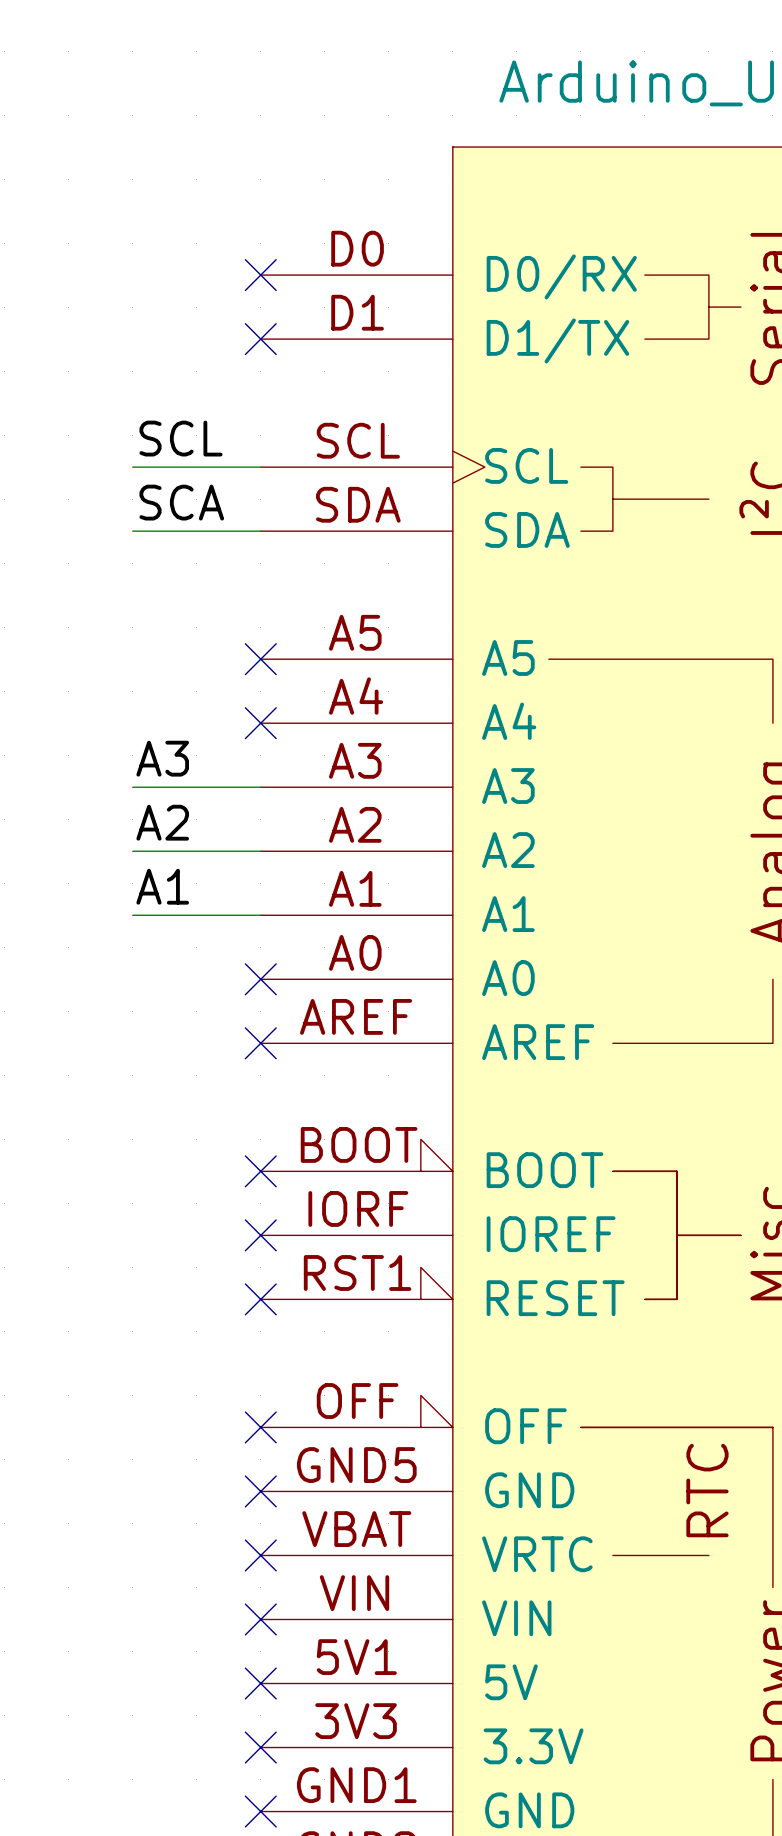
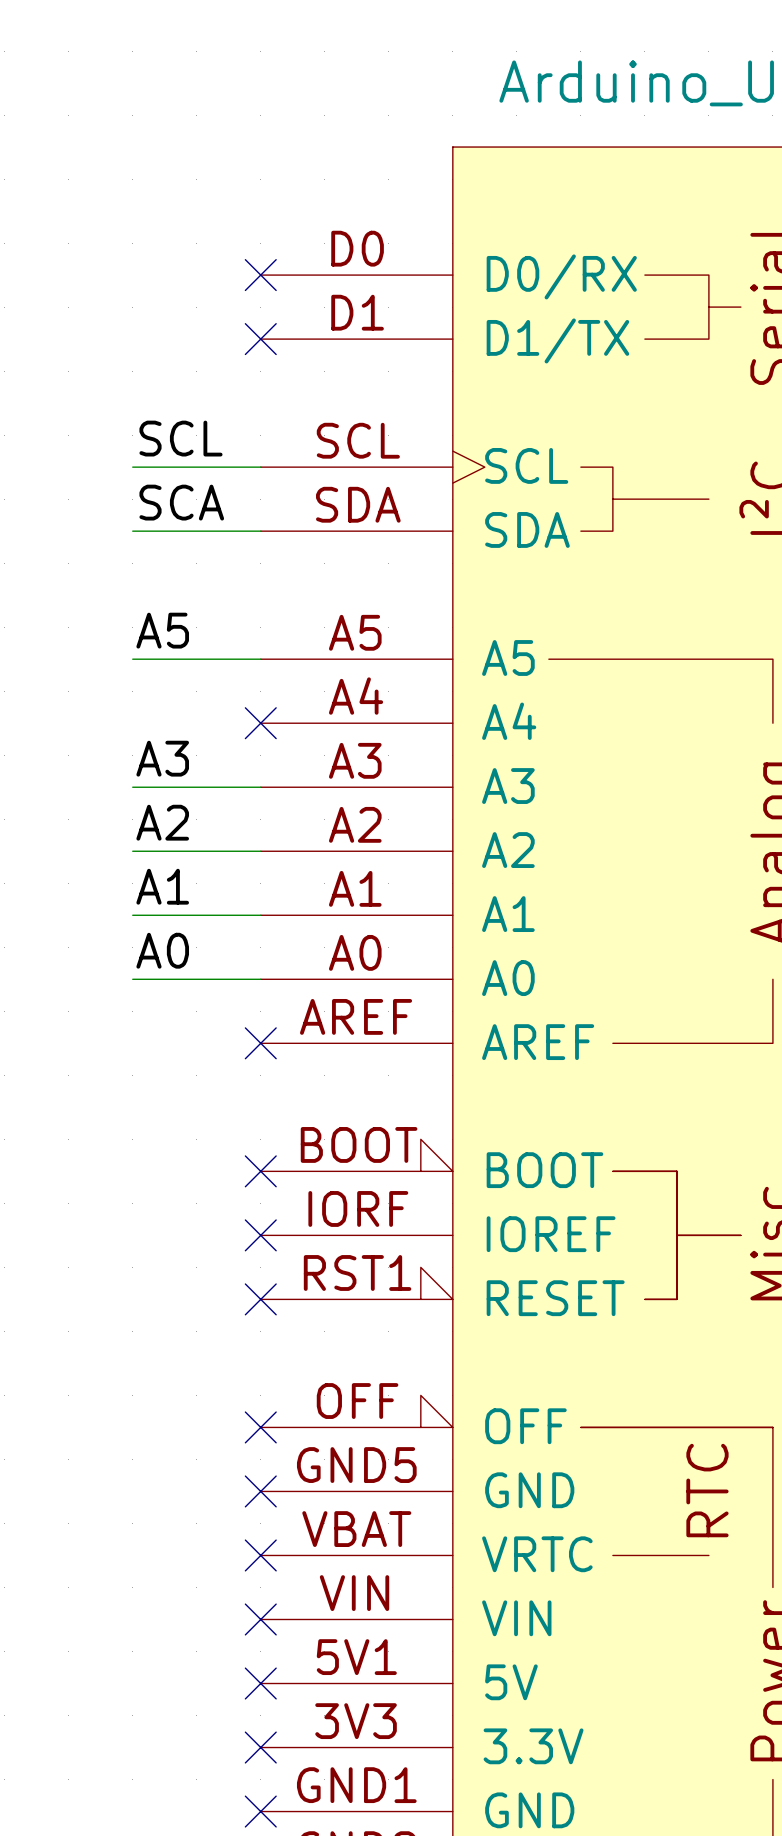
label: none -> A5 (162, 630)
wire: none -> (132, 659) (260, 659)
no-connect mark: (260, 659) -> none
label: none -> A0 (162, 950)
wire: none -> (132, 979) (260, 979)
no-connect mark: (260, 979) -> none

